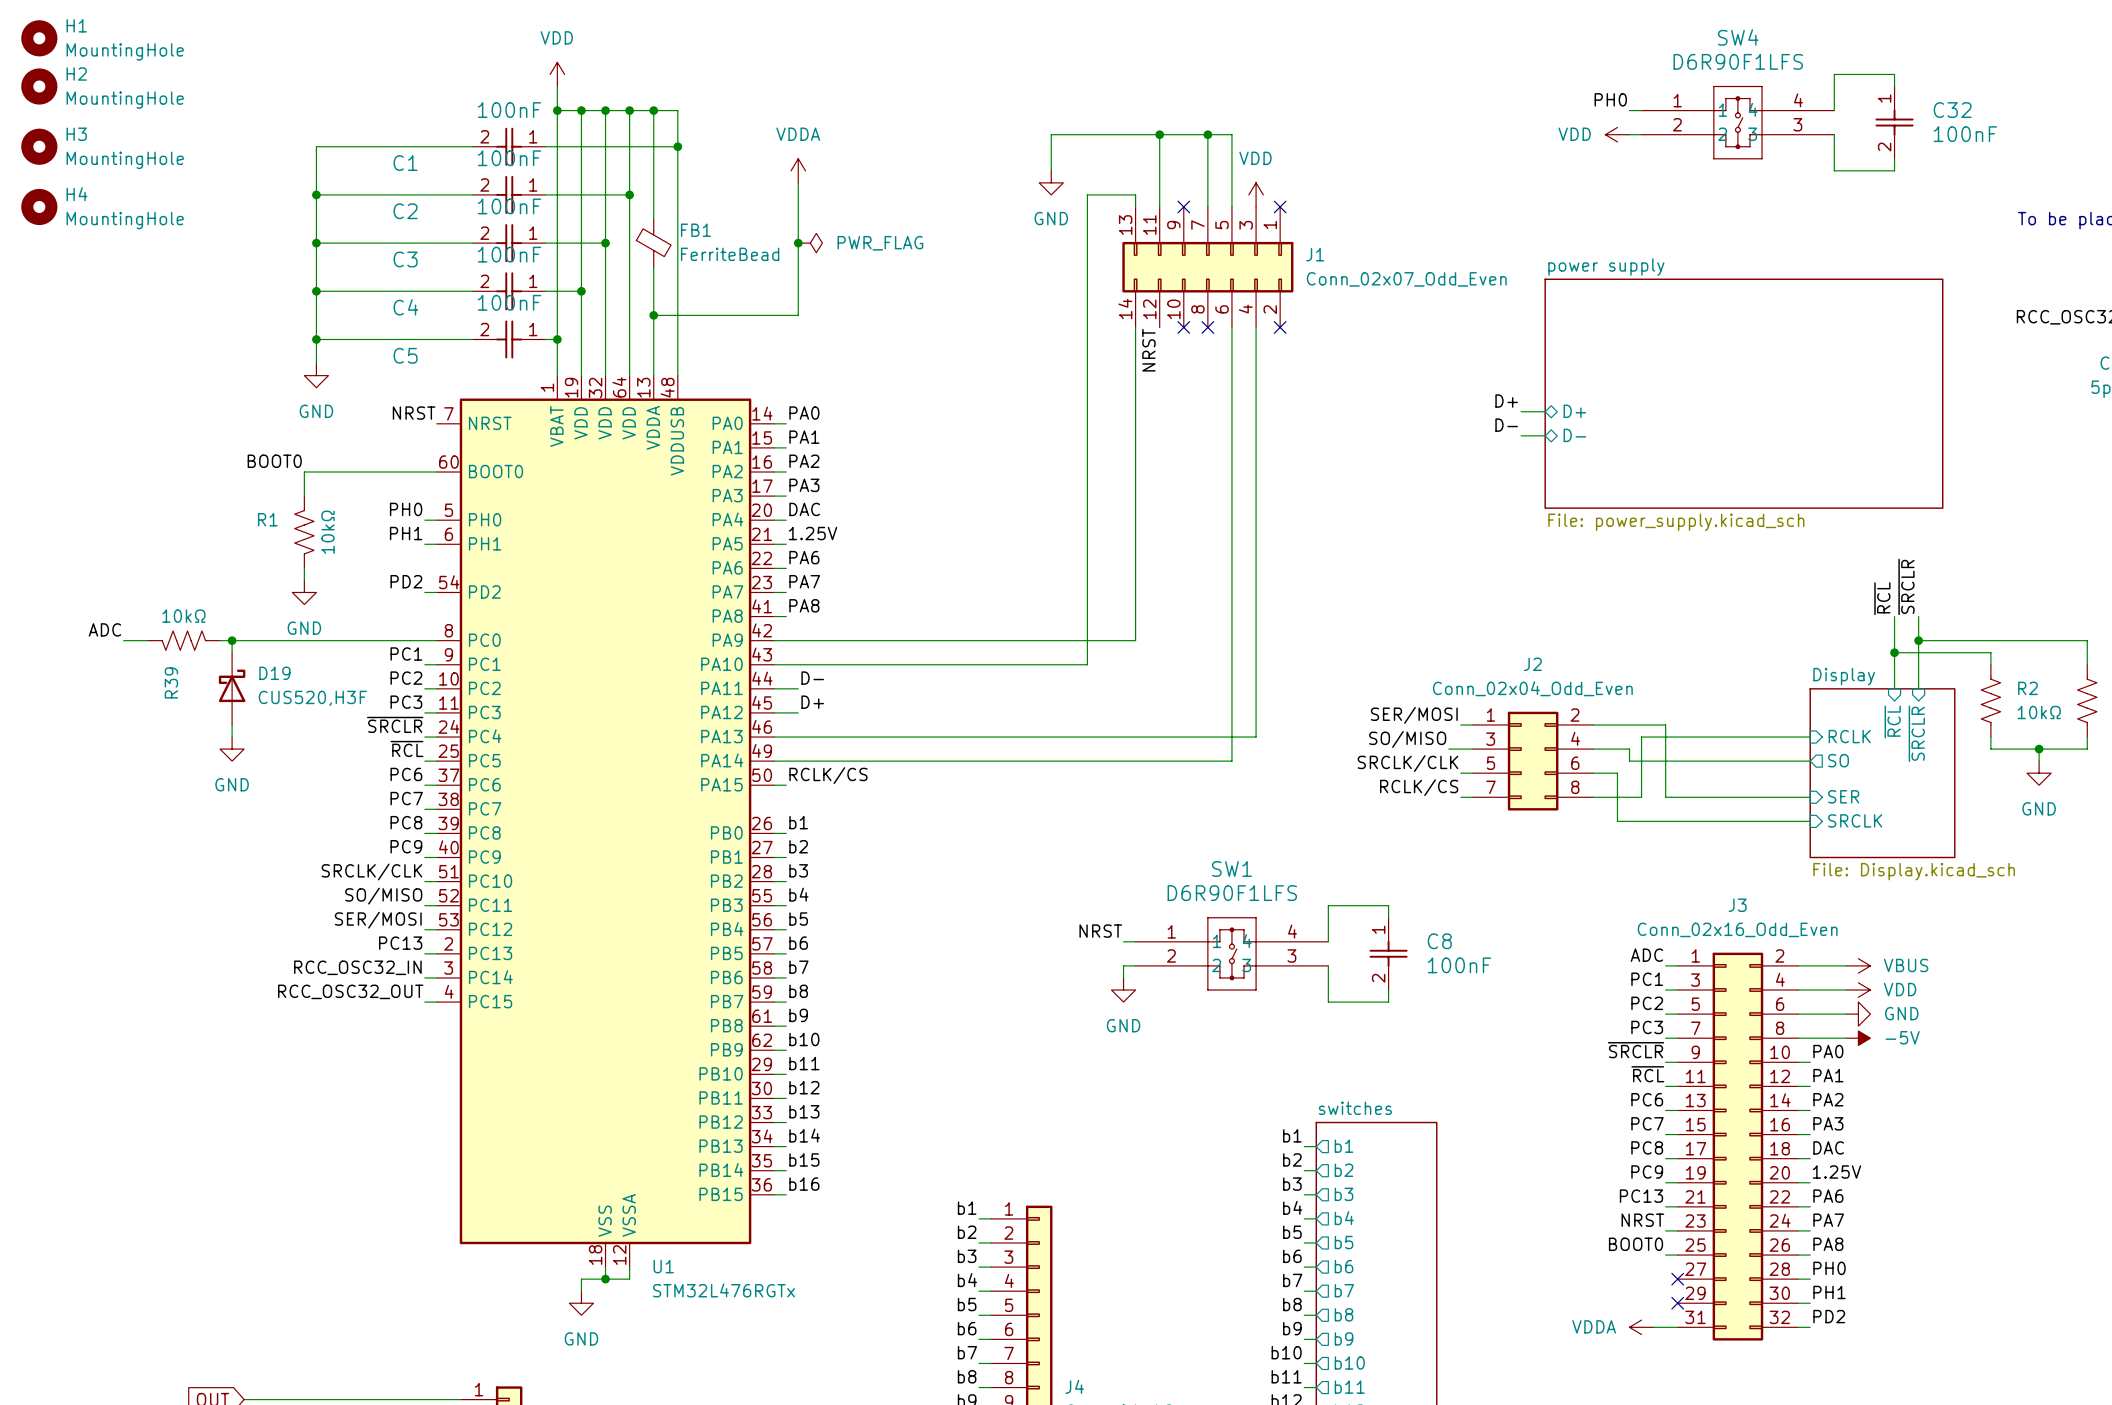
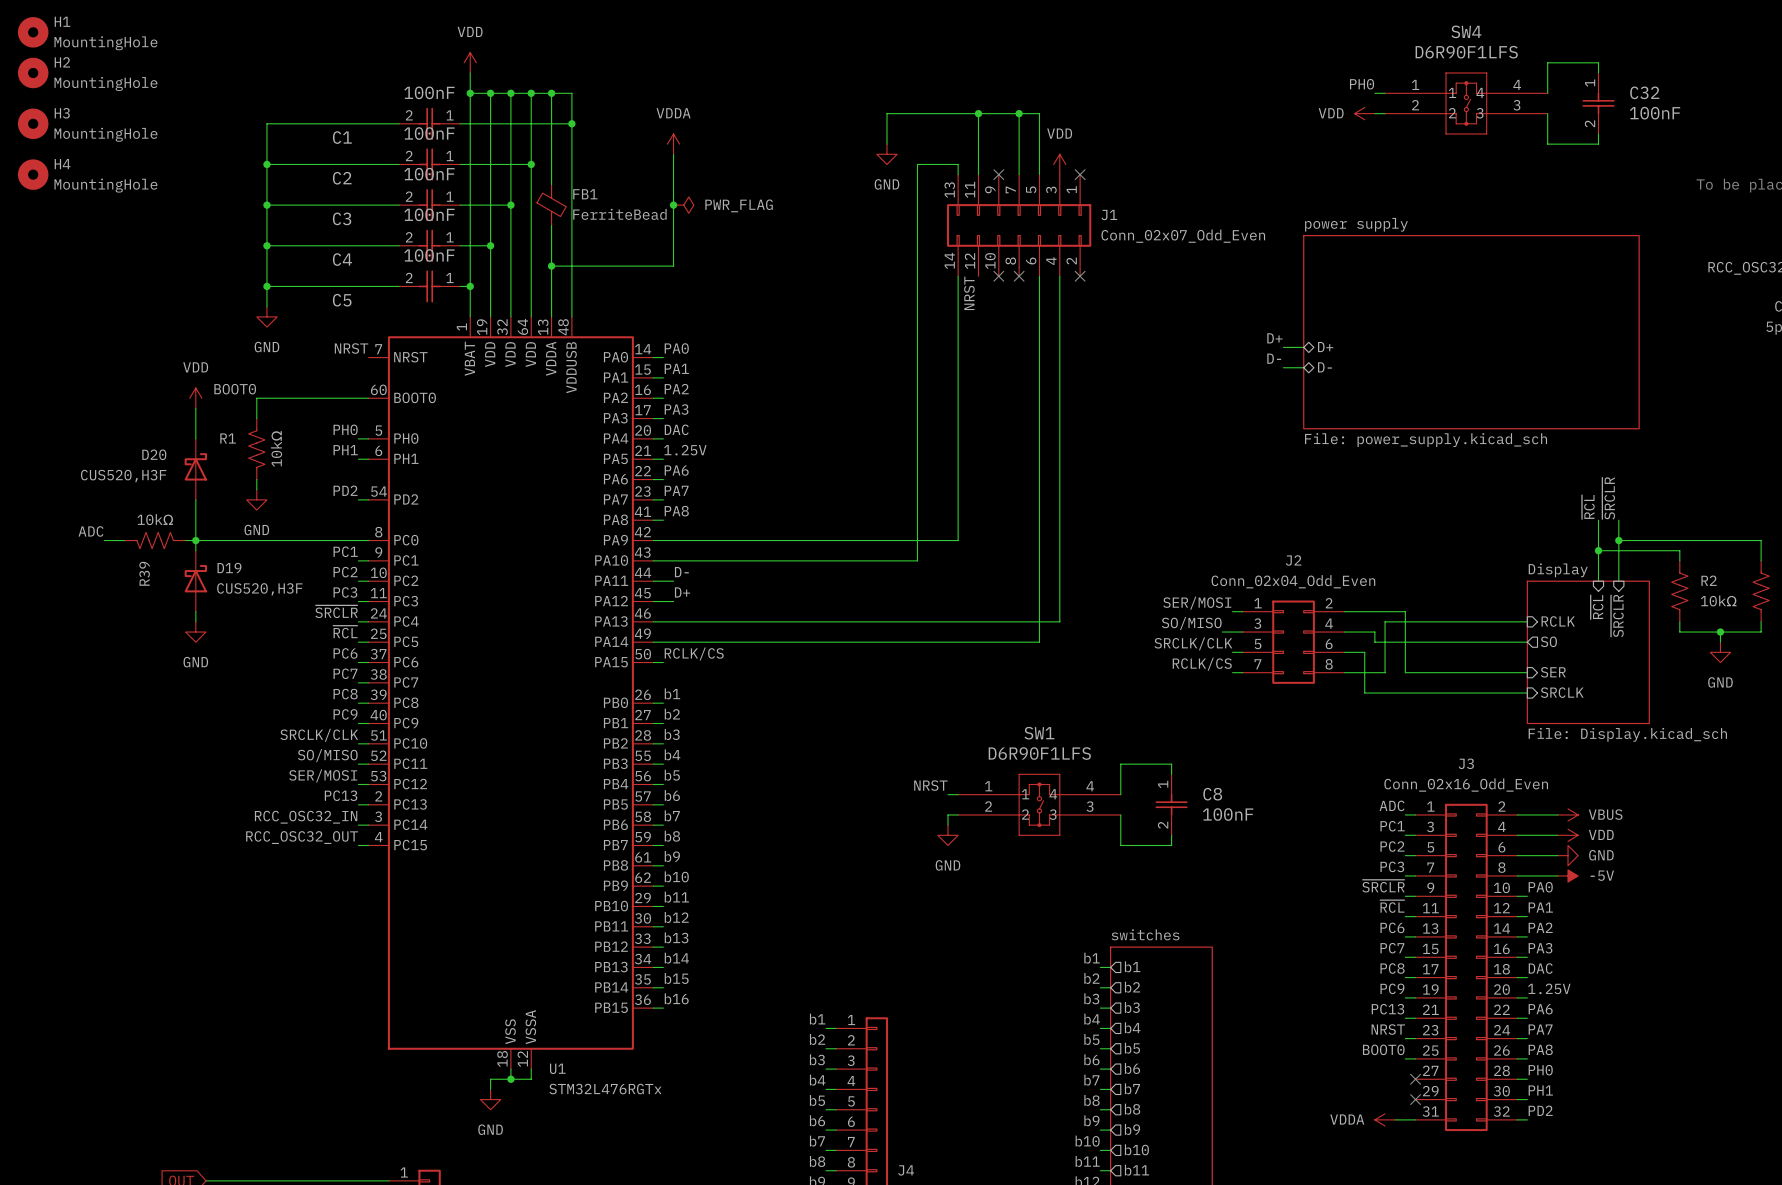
power symbol: none -> VDD (195, 398)
wire: none -> (195, 408) (195, 438)
D20: none -> CUS520,H3F (195, 469)
wire: none -> (195, 499) (195, 540)

